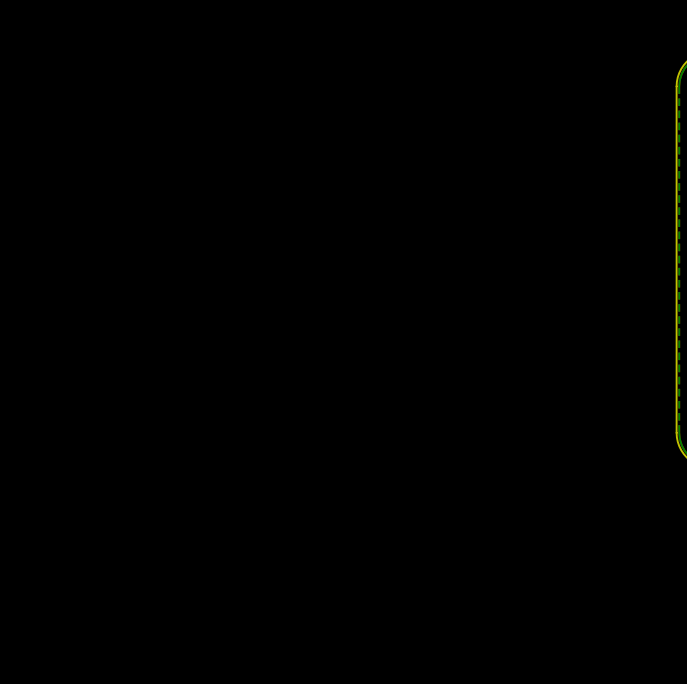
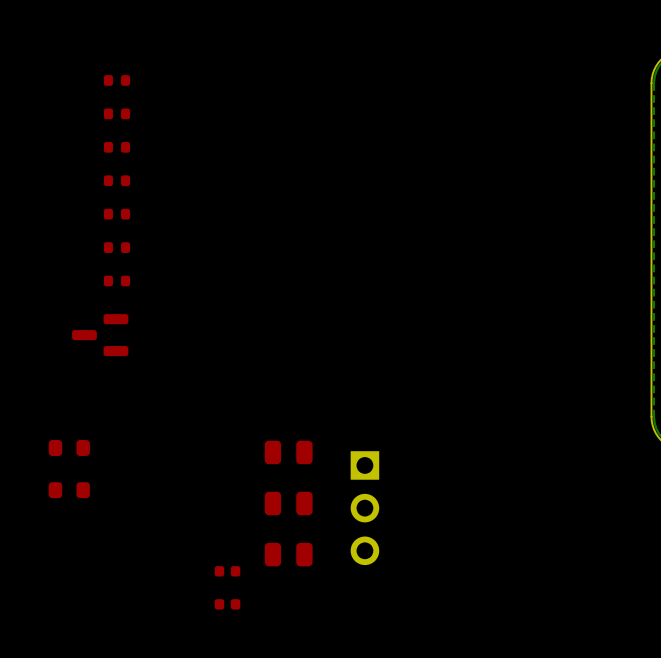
part: none -> (116, 80)
part: none -> (116, 113)
part: none -> (116, 147)
part: none -> (116, 180)
part: none -> (116, 214)
part: none -> (116, 247)
part: none -> (116, 281)
part: none -> (100, 335)
part: none -> (69, 448)
part: none -> (288, 452)
part: none -> (69, 490)
part: none -> (288, 503)
part: none -> (364, 508)
part: none -> (288, 554)
part: none -> (227, 571)
part: none -> (227, 604)

